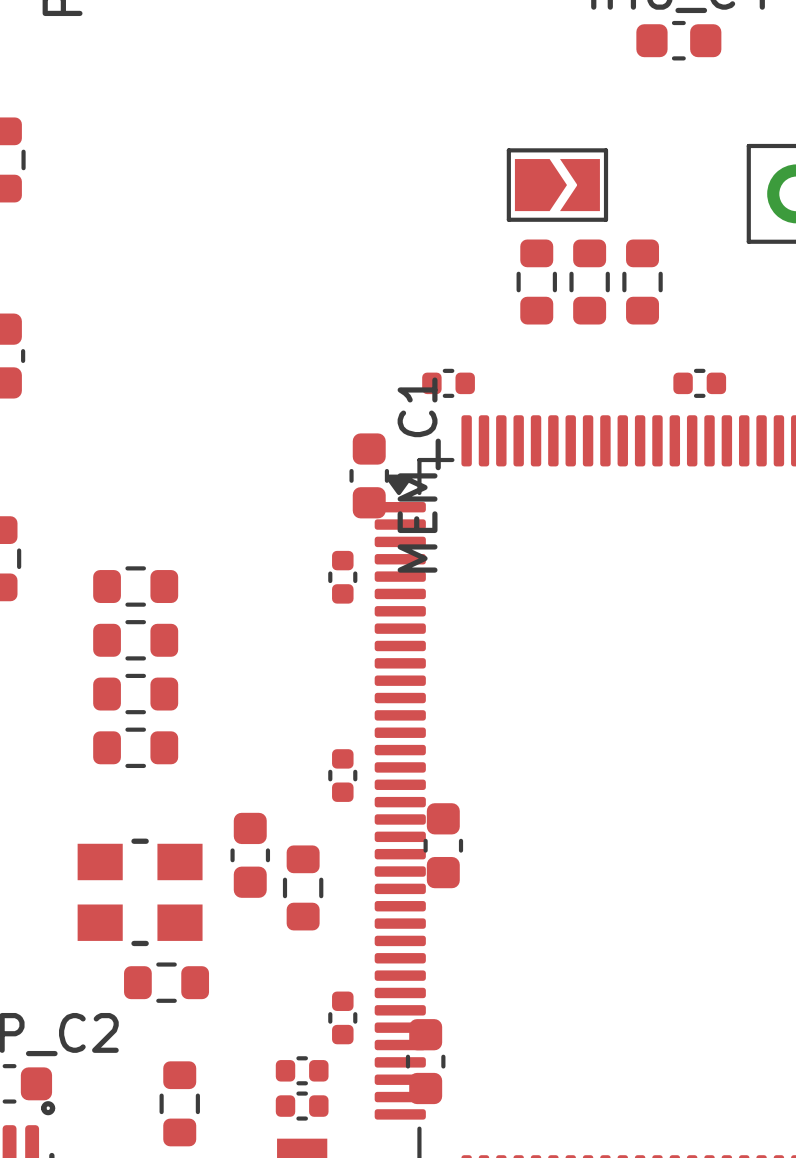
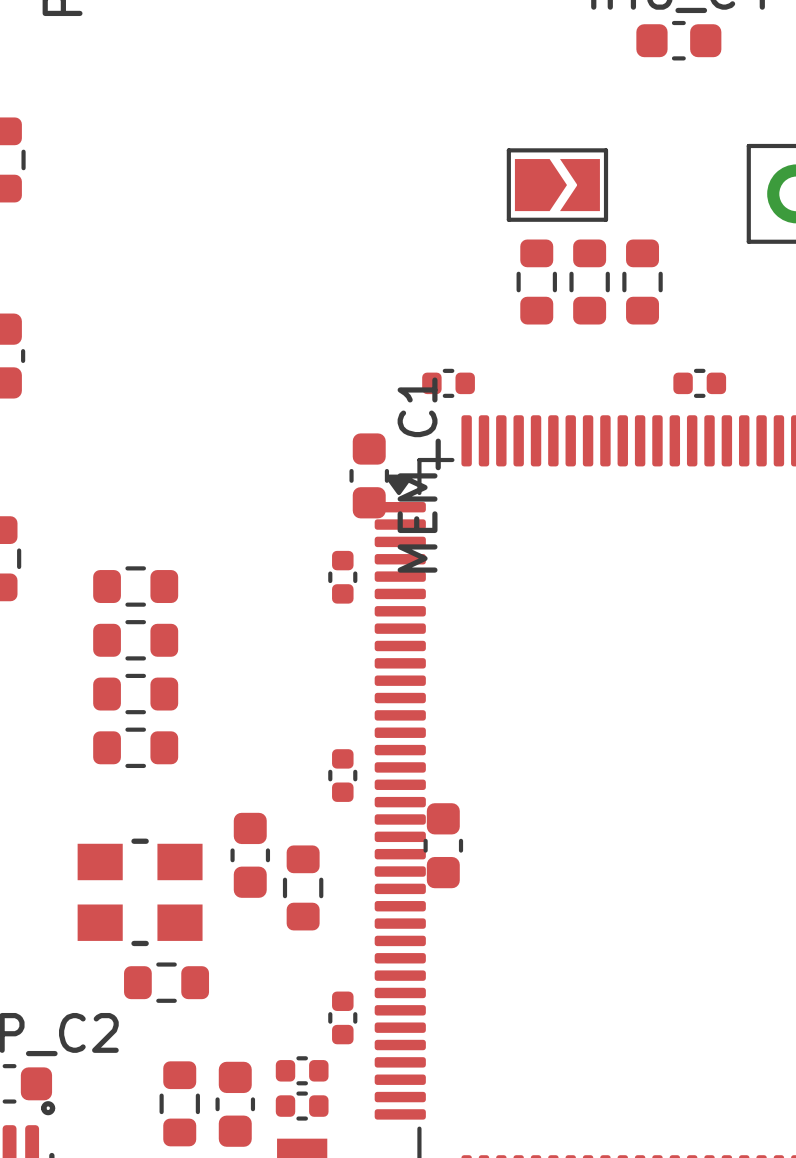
part position: (425, 1061) -> (235, 1104)

